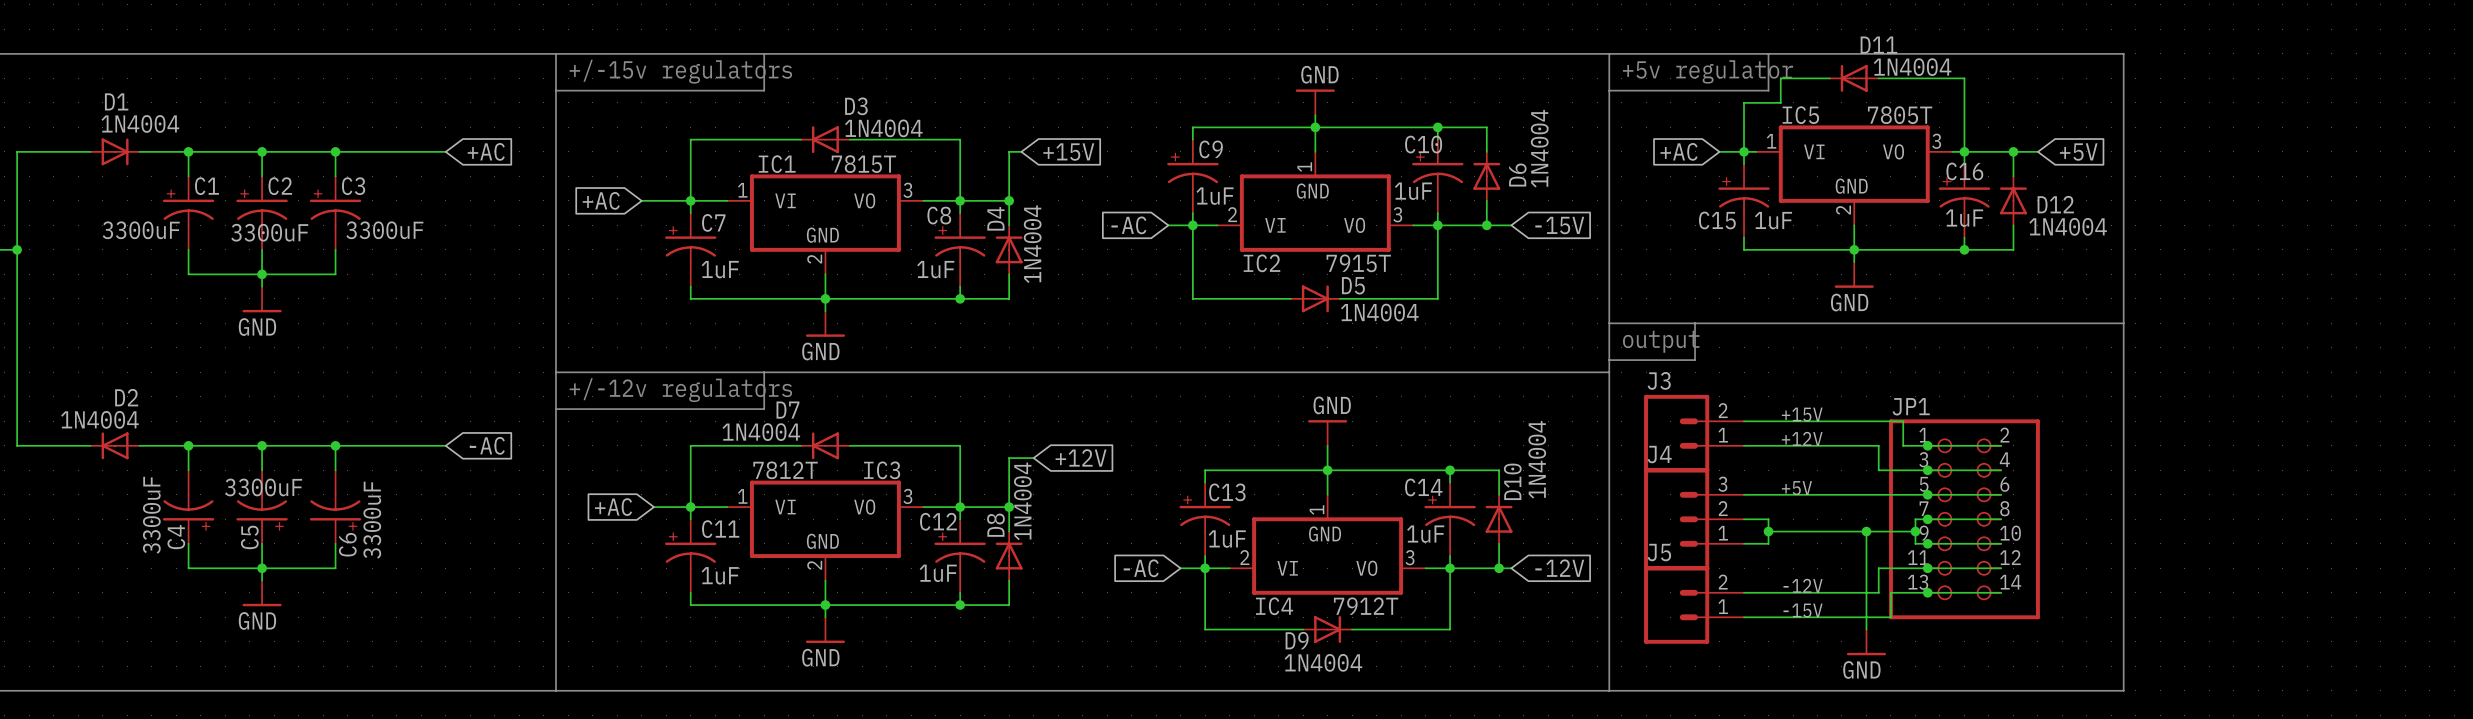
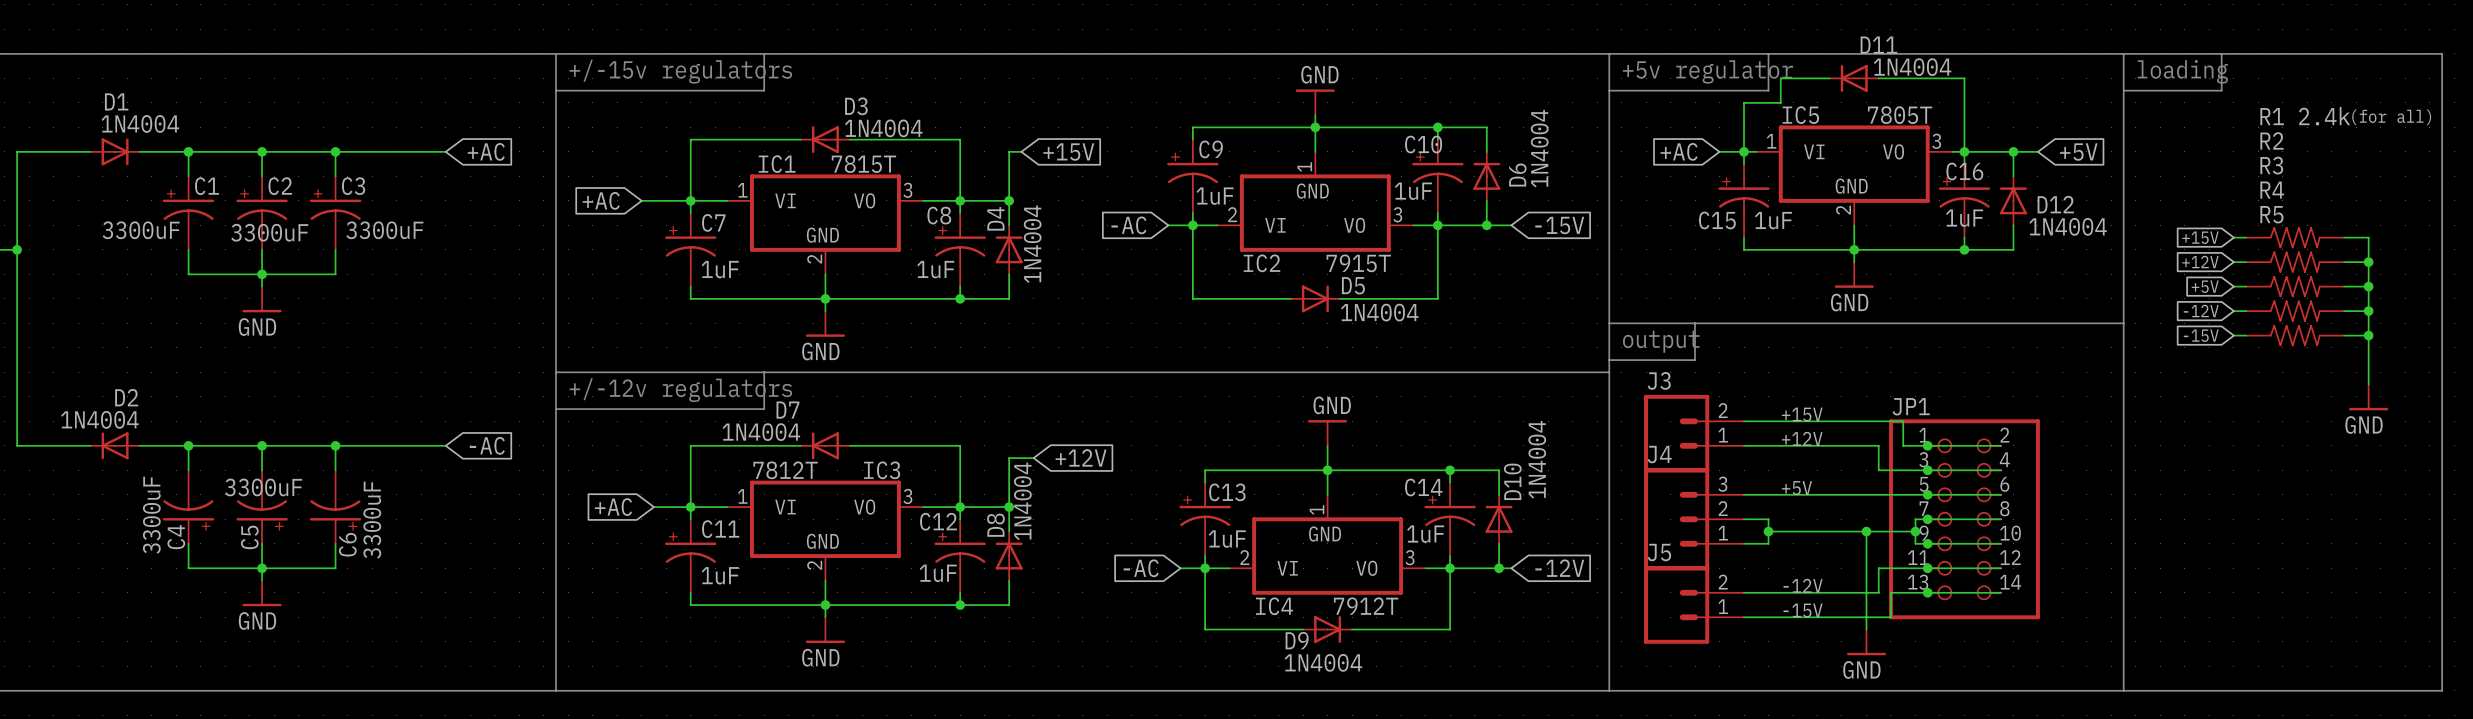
line: none -> (2123, 53) (2442, 53) (2442, 690) (2123, 690)
line: none -> (2221, 53) (2221, 90) (2123, 90)
text: none -> loading (2182, 71)
text: none -> (for all) (2391, 117)
global label: none -> +15V (2200, 237)
wire: none -> (2233, 237) (2246, 237)
R1: none -> 2.4k (2295, 237)
wire: none -> (2344, 237) (2368, 237) (2368, 384)
global label: none -> +12V (2200, 262)
wire: none -> (2233, 262) (2246, 262)
R2: none -> (2295, 262)
wire: none -> (2344, 262) (2368, 262)
junction: none -> (2368, 262)
global label: none -> +5V (2205, 286)
wire: none -> (2233, 286) (2246, 286)
R3: none -> (2295, 286)
wire: none -> (2344, 286) (2368, 286)
junction: none -> (2368, 286)
global label: none -> -12V (2201, 310)
wire: none -> (2233, 311) (2246, 311)
R4: none -> (2295, 311)
wire: none -> (2344, 311) (2368, 311)
junction: none -> (2368, 311)
global label: none -> -15V (2201, 335)
wire: none -> (2233, 335) (2246, 335)
R5: none -> (2295, 335)
wire: none -> (2344, 335) (2368, 335)
junction: none -> (2368, 335)
power symbol: none -> GND (2368, 397)

